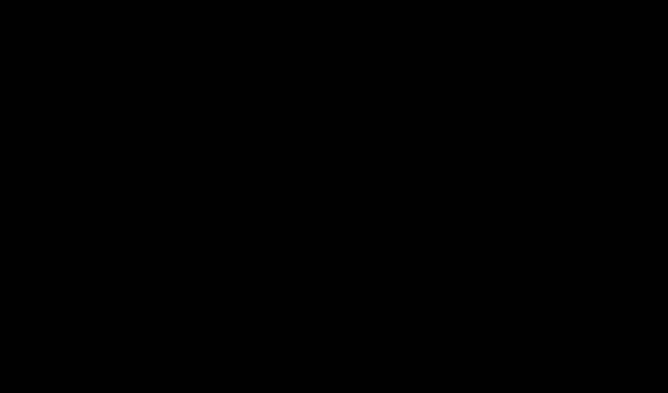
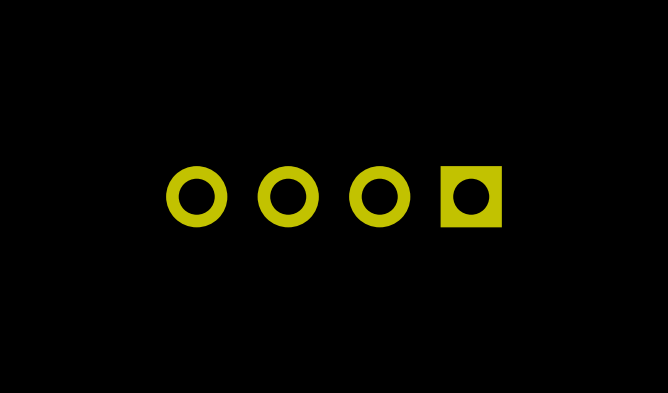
part: none -> (333, 196)

